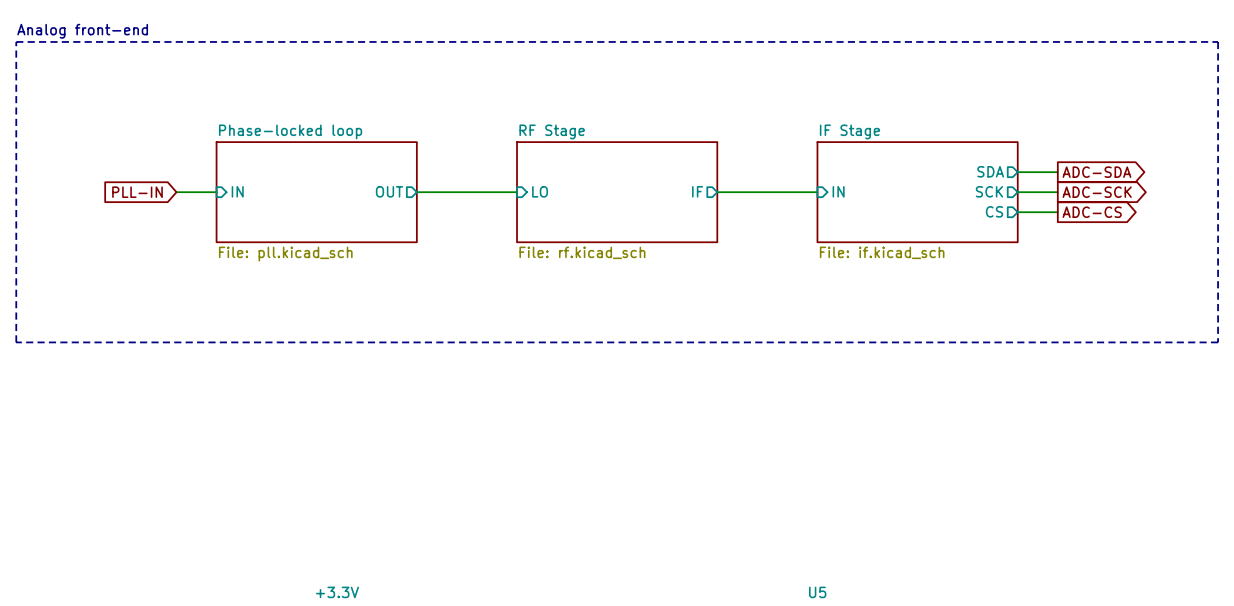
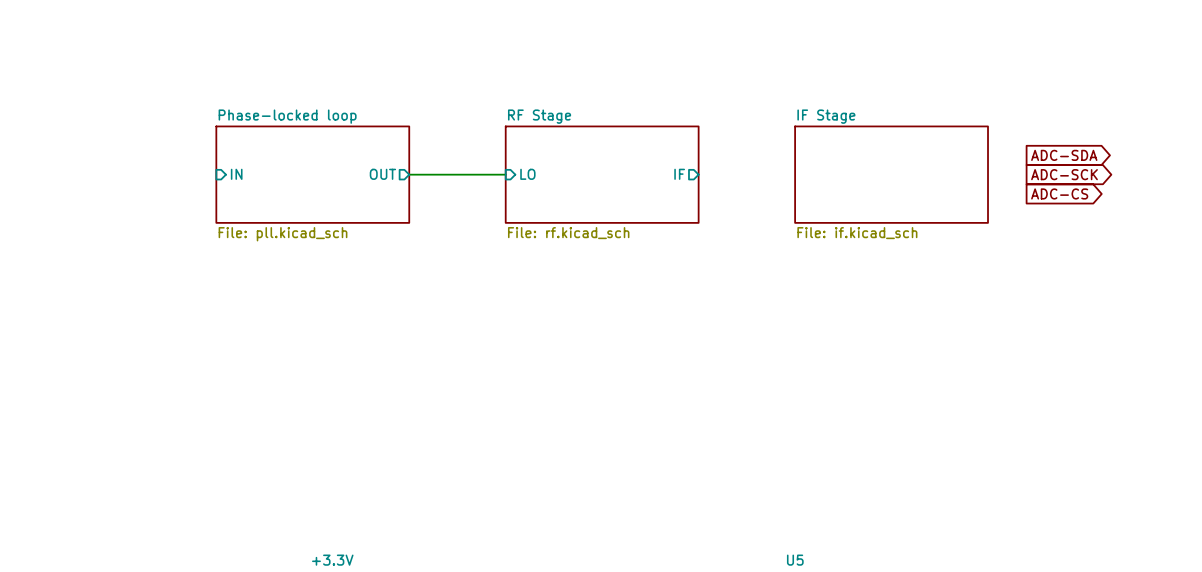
text: Analog front-end (82, 31) -> none
line: (16, 41) (1218, 41) (1218, 342) (16, 342) (16, 41) -> none
sheet pin: SDA (990, 171) -> none
wire: (1017, 172) (1057, 172) -> none
sheet pin: IN (838, 191) -> none
sheet pin: SCK (989, 191) -> none
global label: PLL-IN (137, 192) -> none
wire: (176, 192) (216, 192) -> none
wire: (717, 192) (817, 192) -> none
wire: (1017, 192) (1057, 192) -> none
sheet pin: CS (994, 211) -> none
wire: (1017, 212) (1057, 212) -> none

